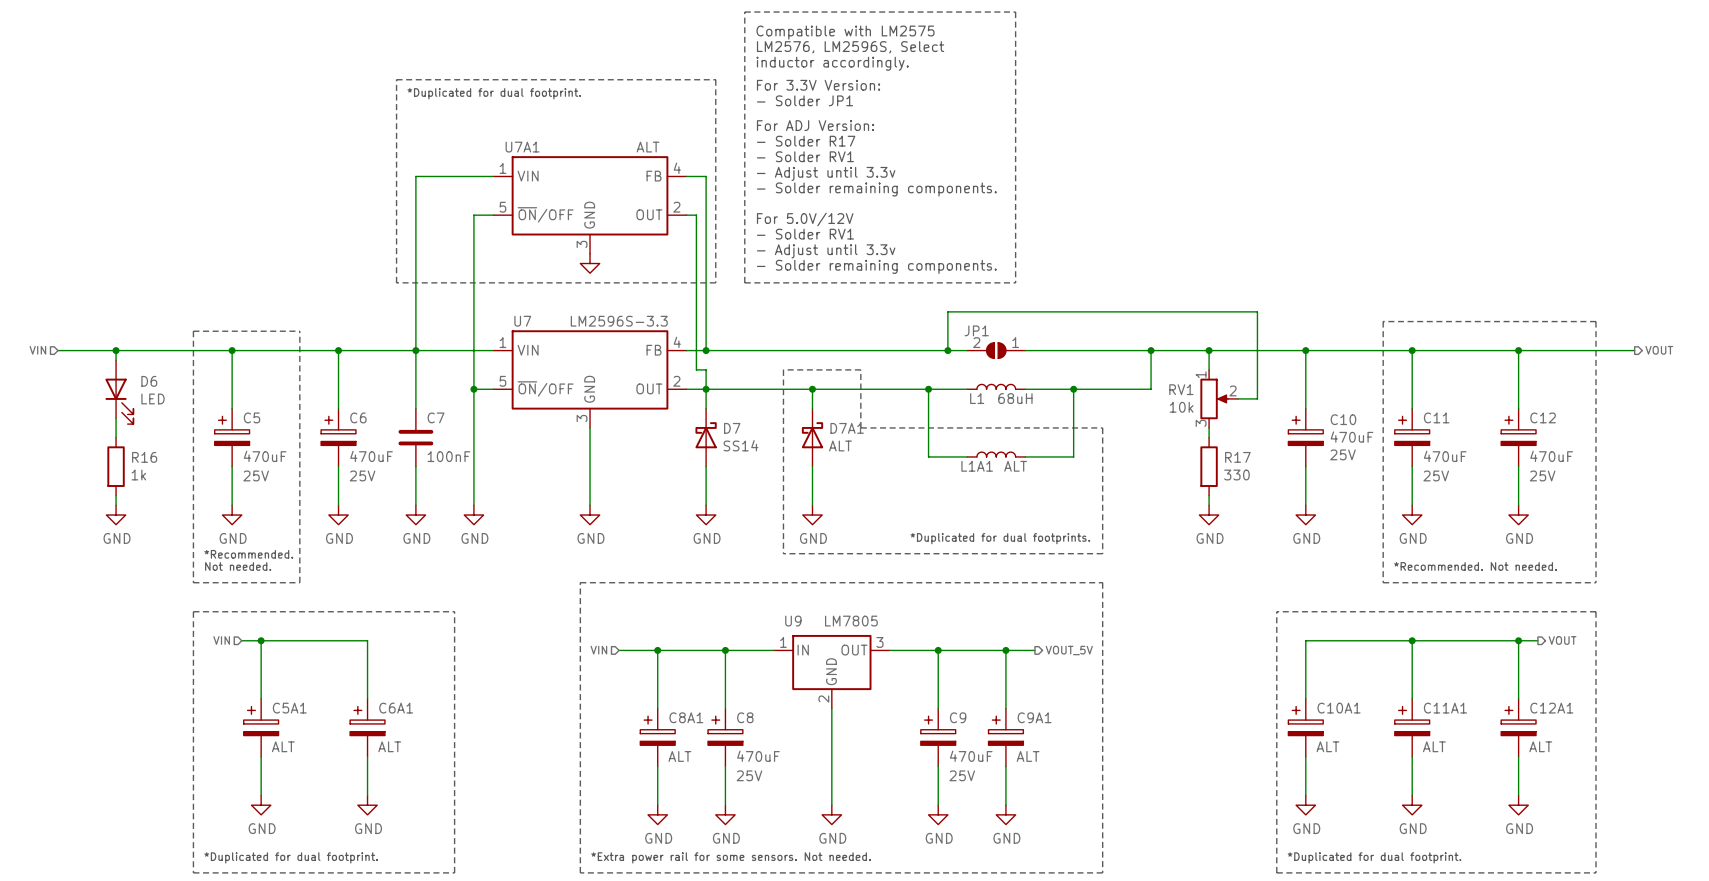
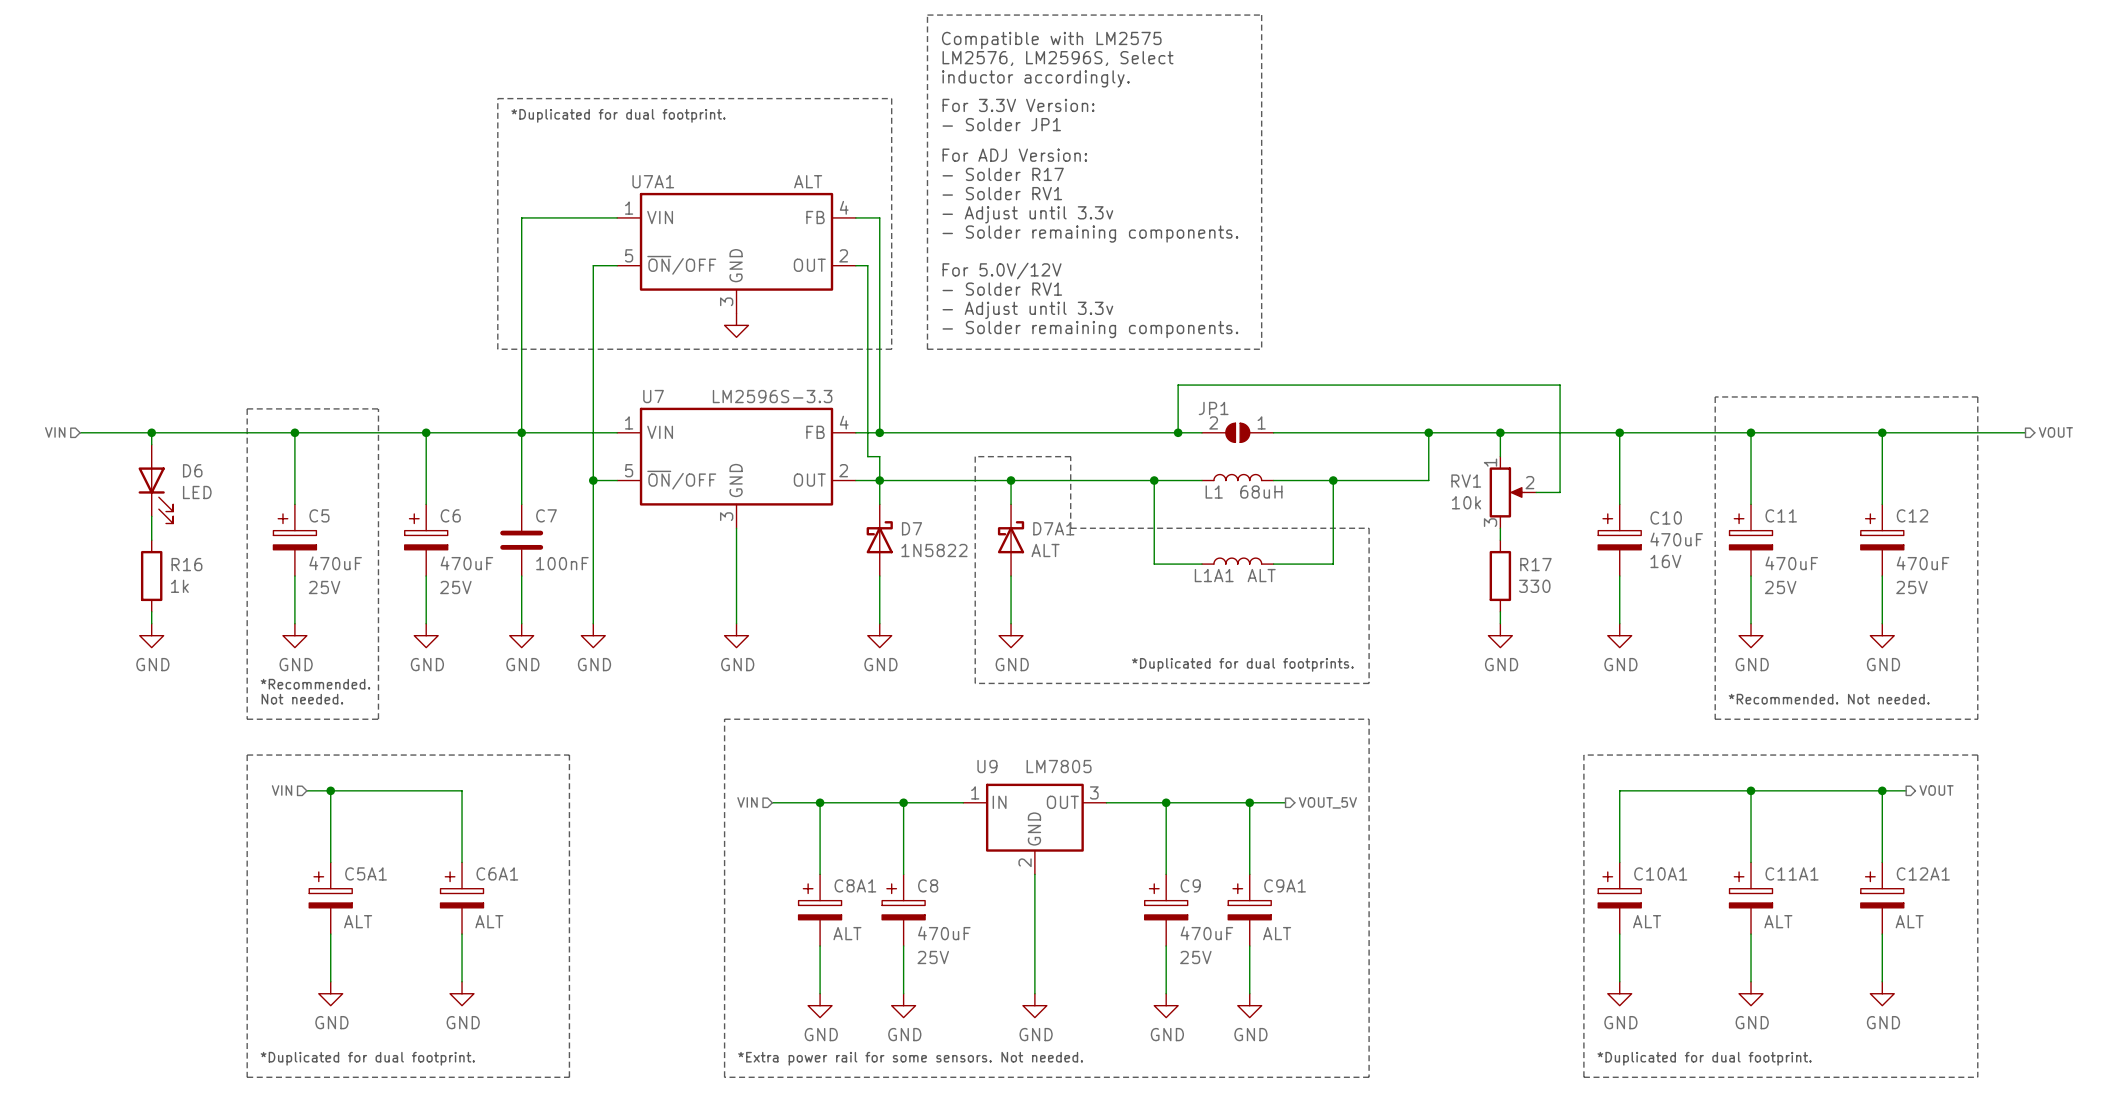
D7 value: SS14 (740, 445) -> 1N5822 (934, 550)
C10 text: 25V (1342, 454) -> 16V (1665, 561)

